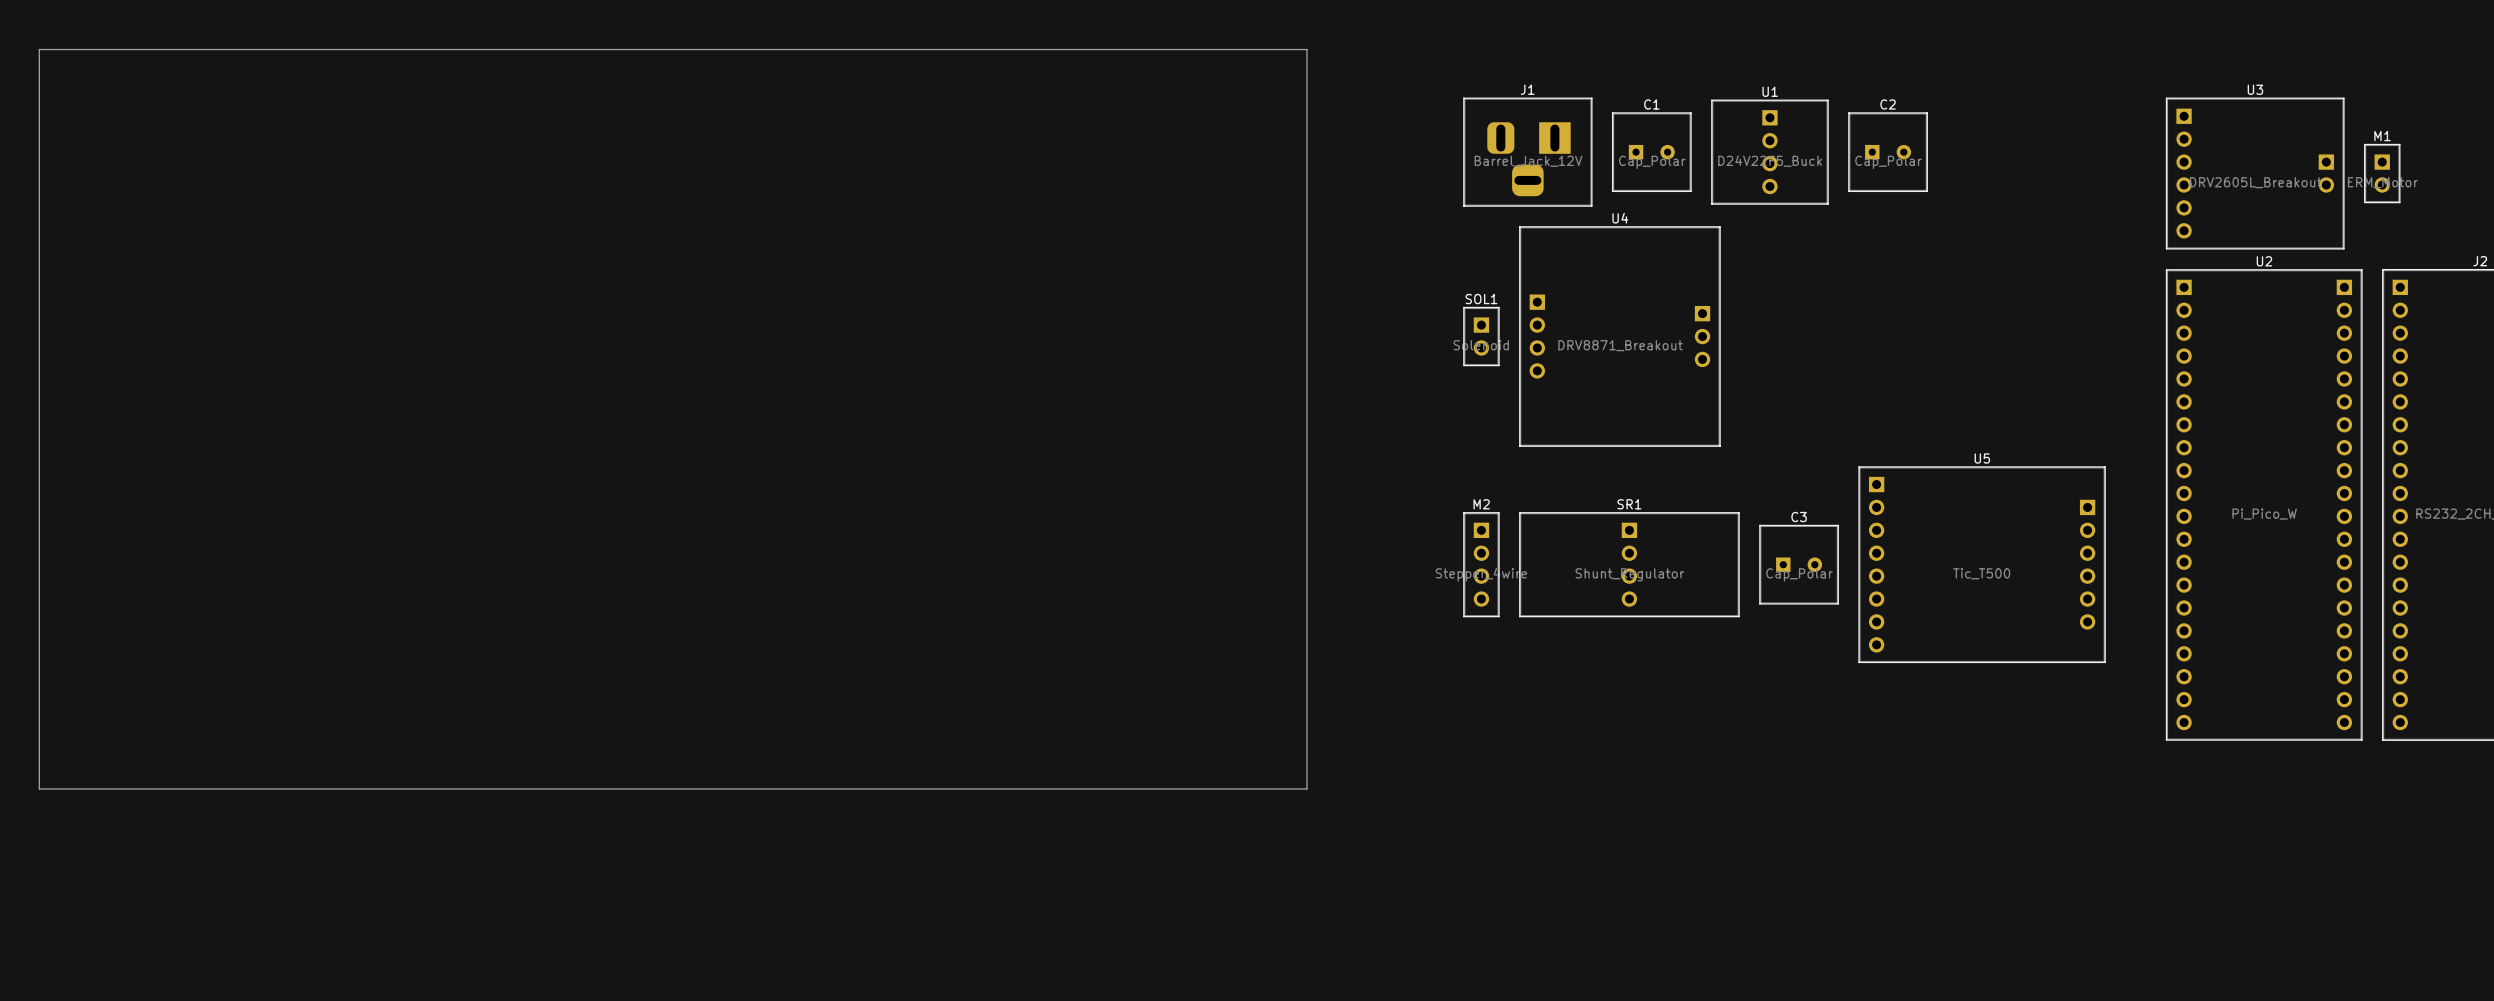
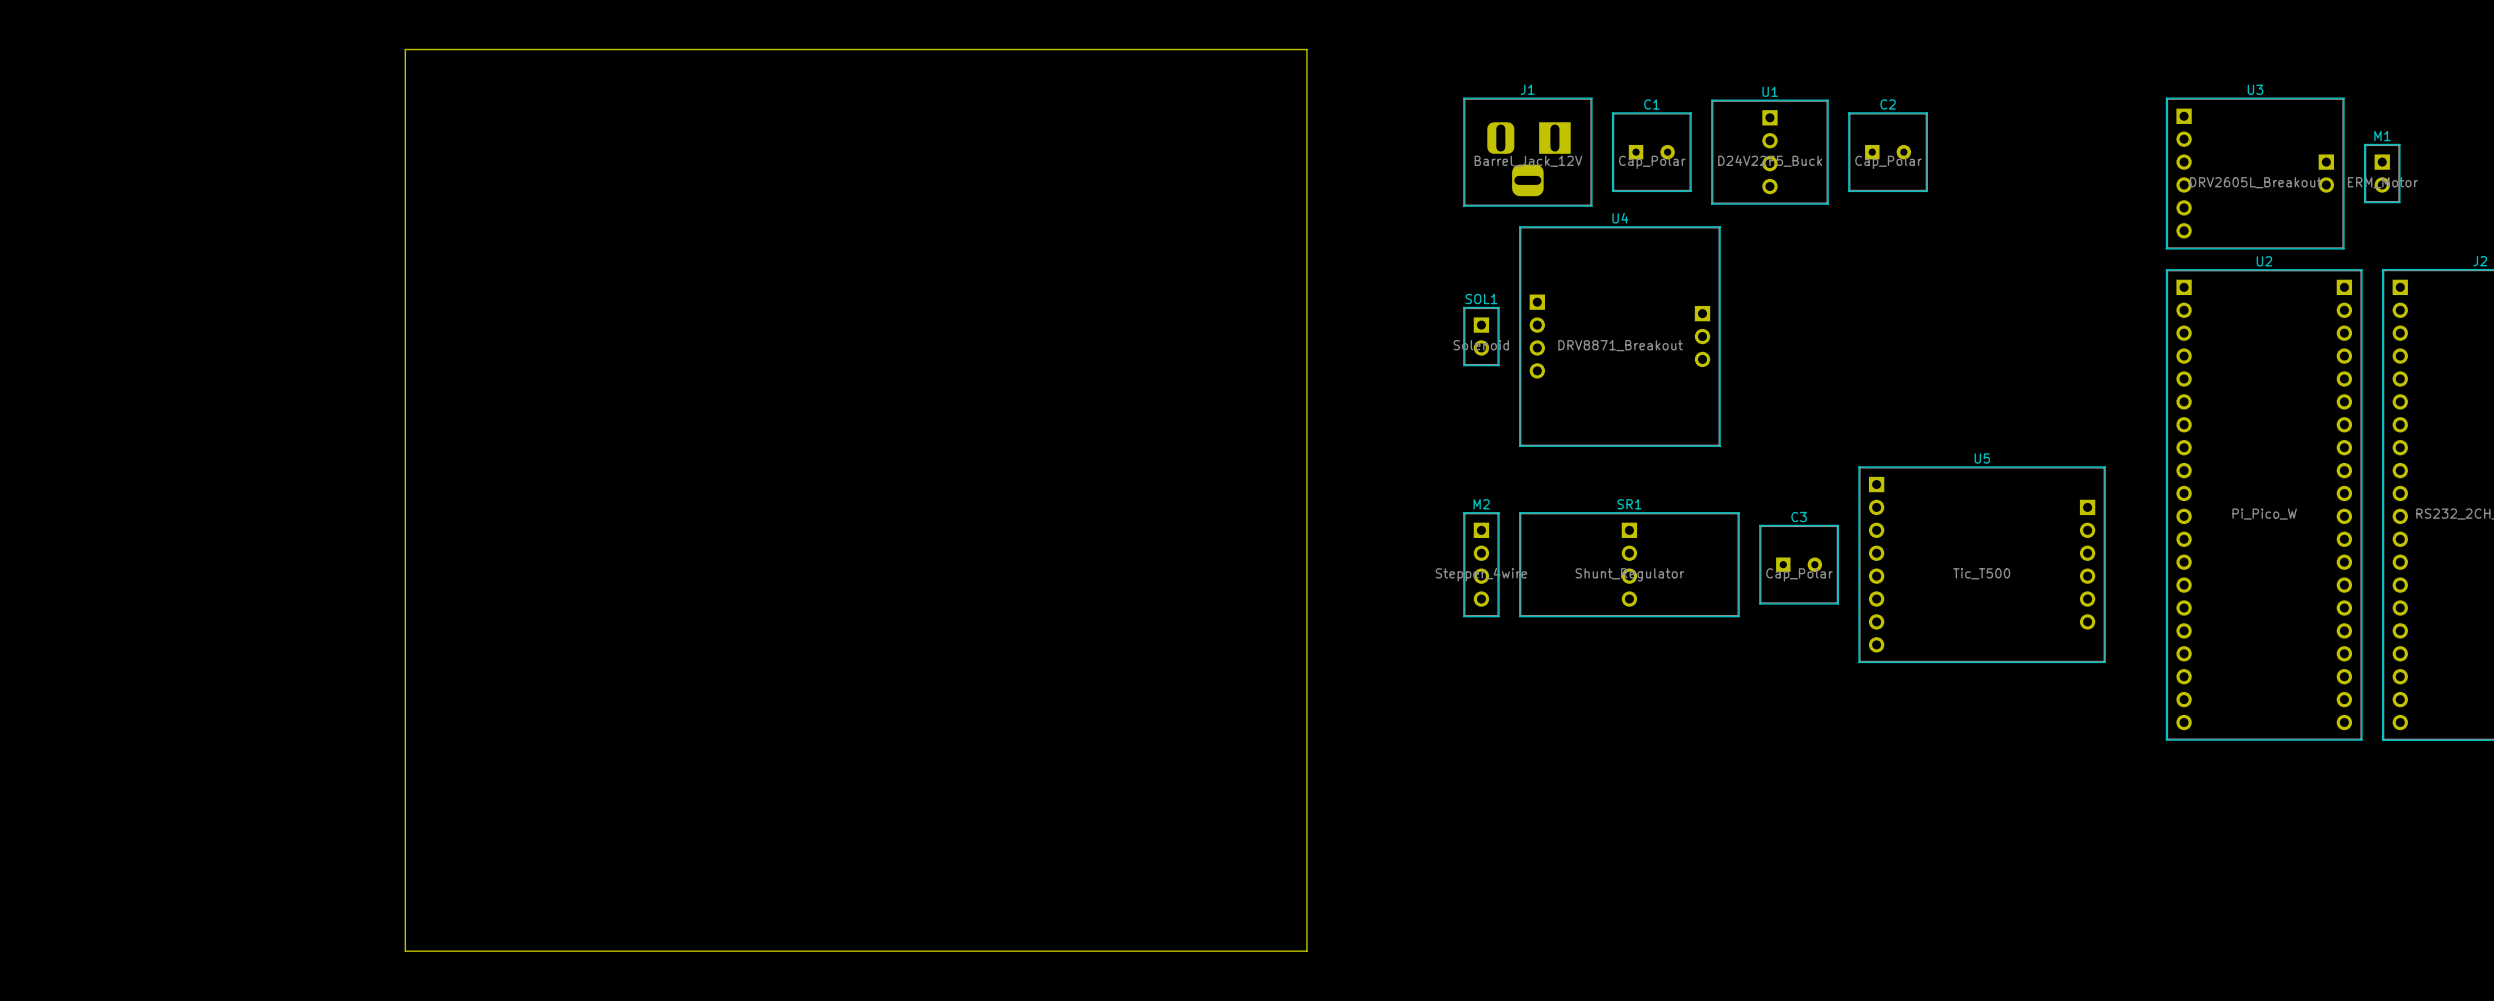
board edge: (405, 49) (39, 49) (39, 788) (1306, 788) -> (405, 49) (405, 951) (1306, 951) (1306, 788)

